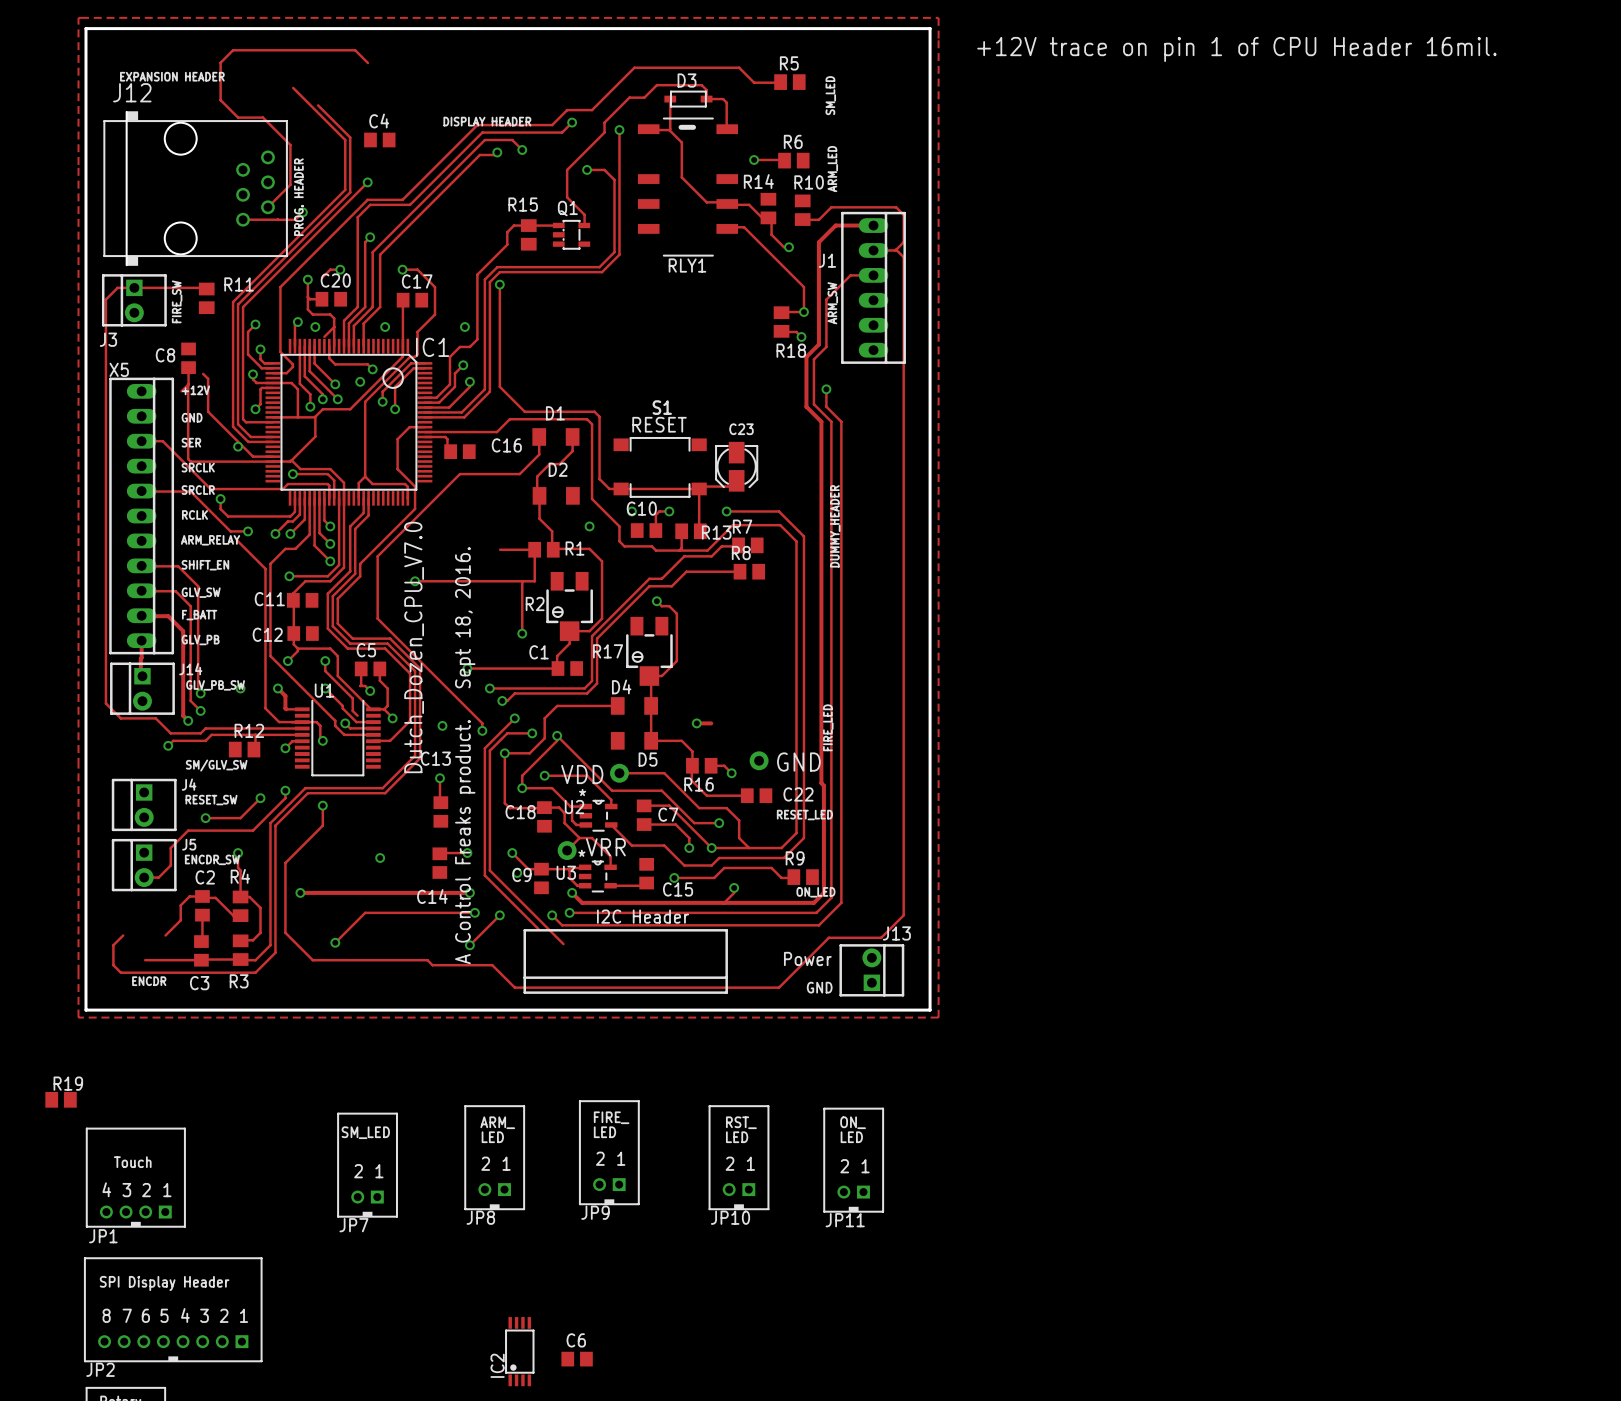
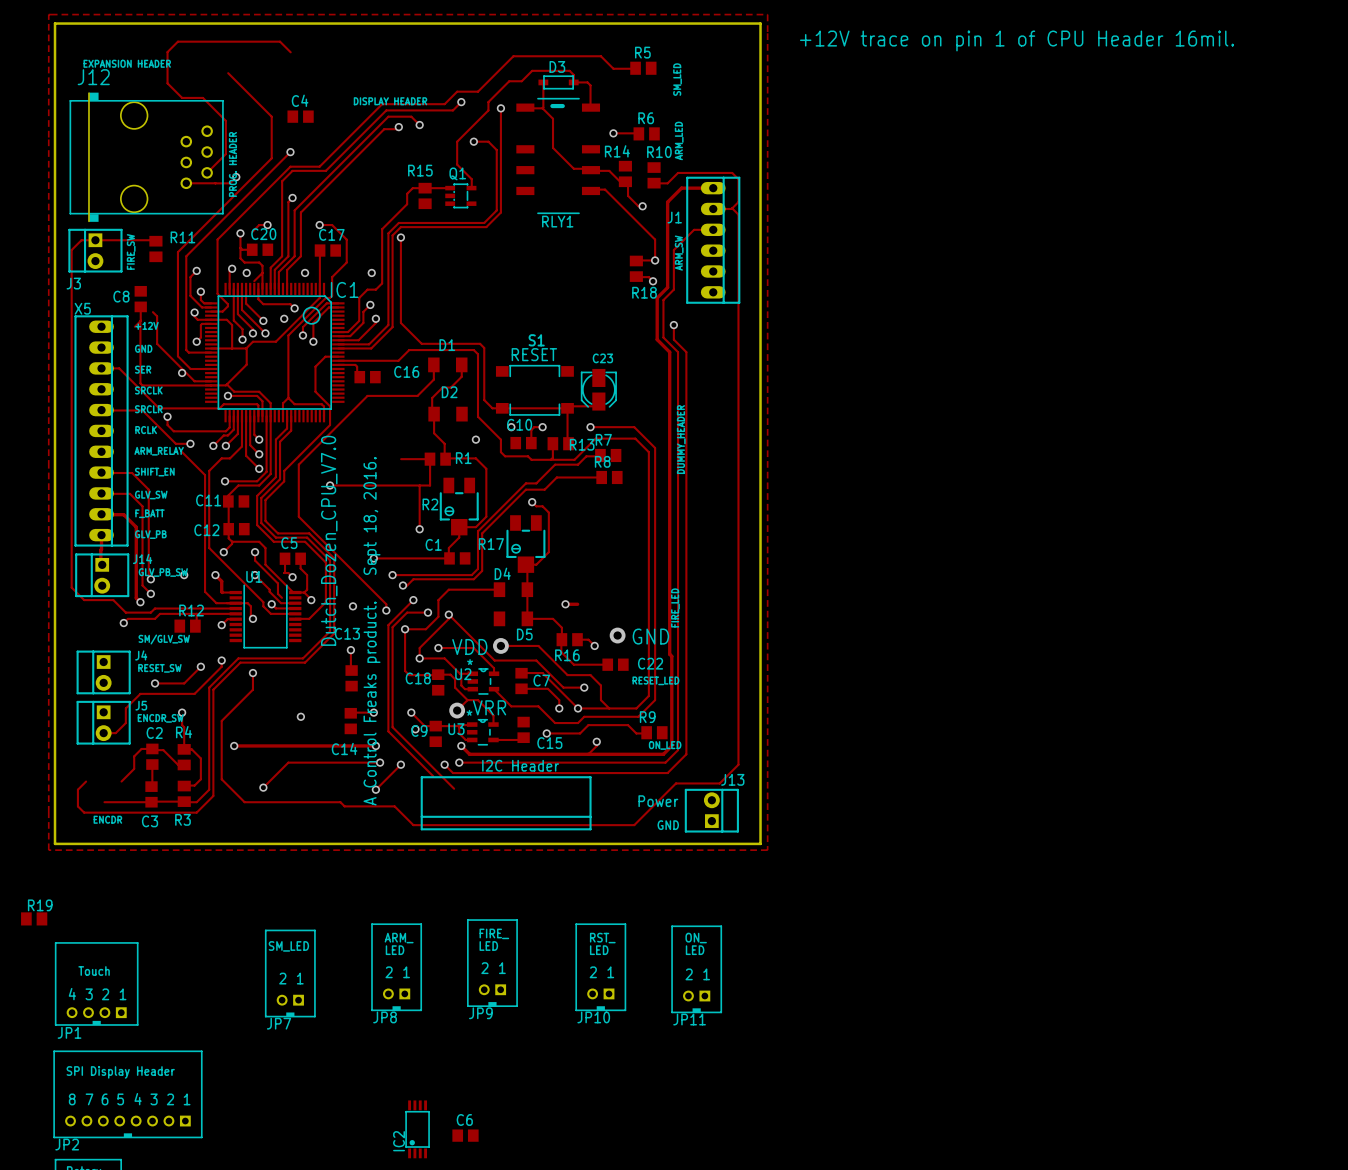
track: (318, 105) (350, 137) (350, 192) (238, 304) (238, 424) (250, 436) (272, 436) -> none

